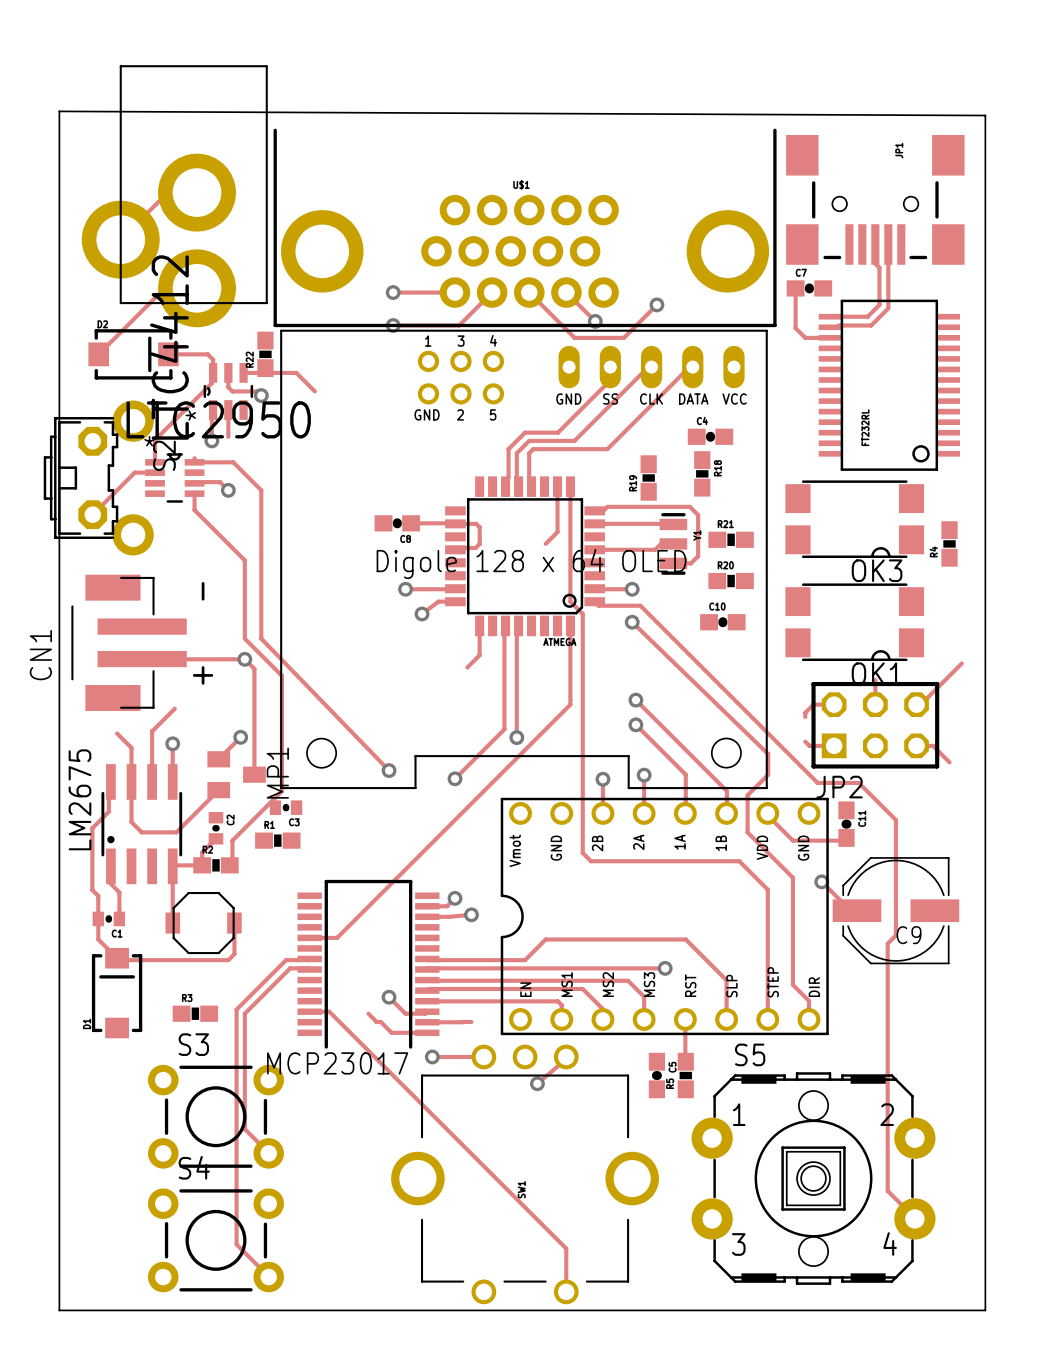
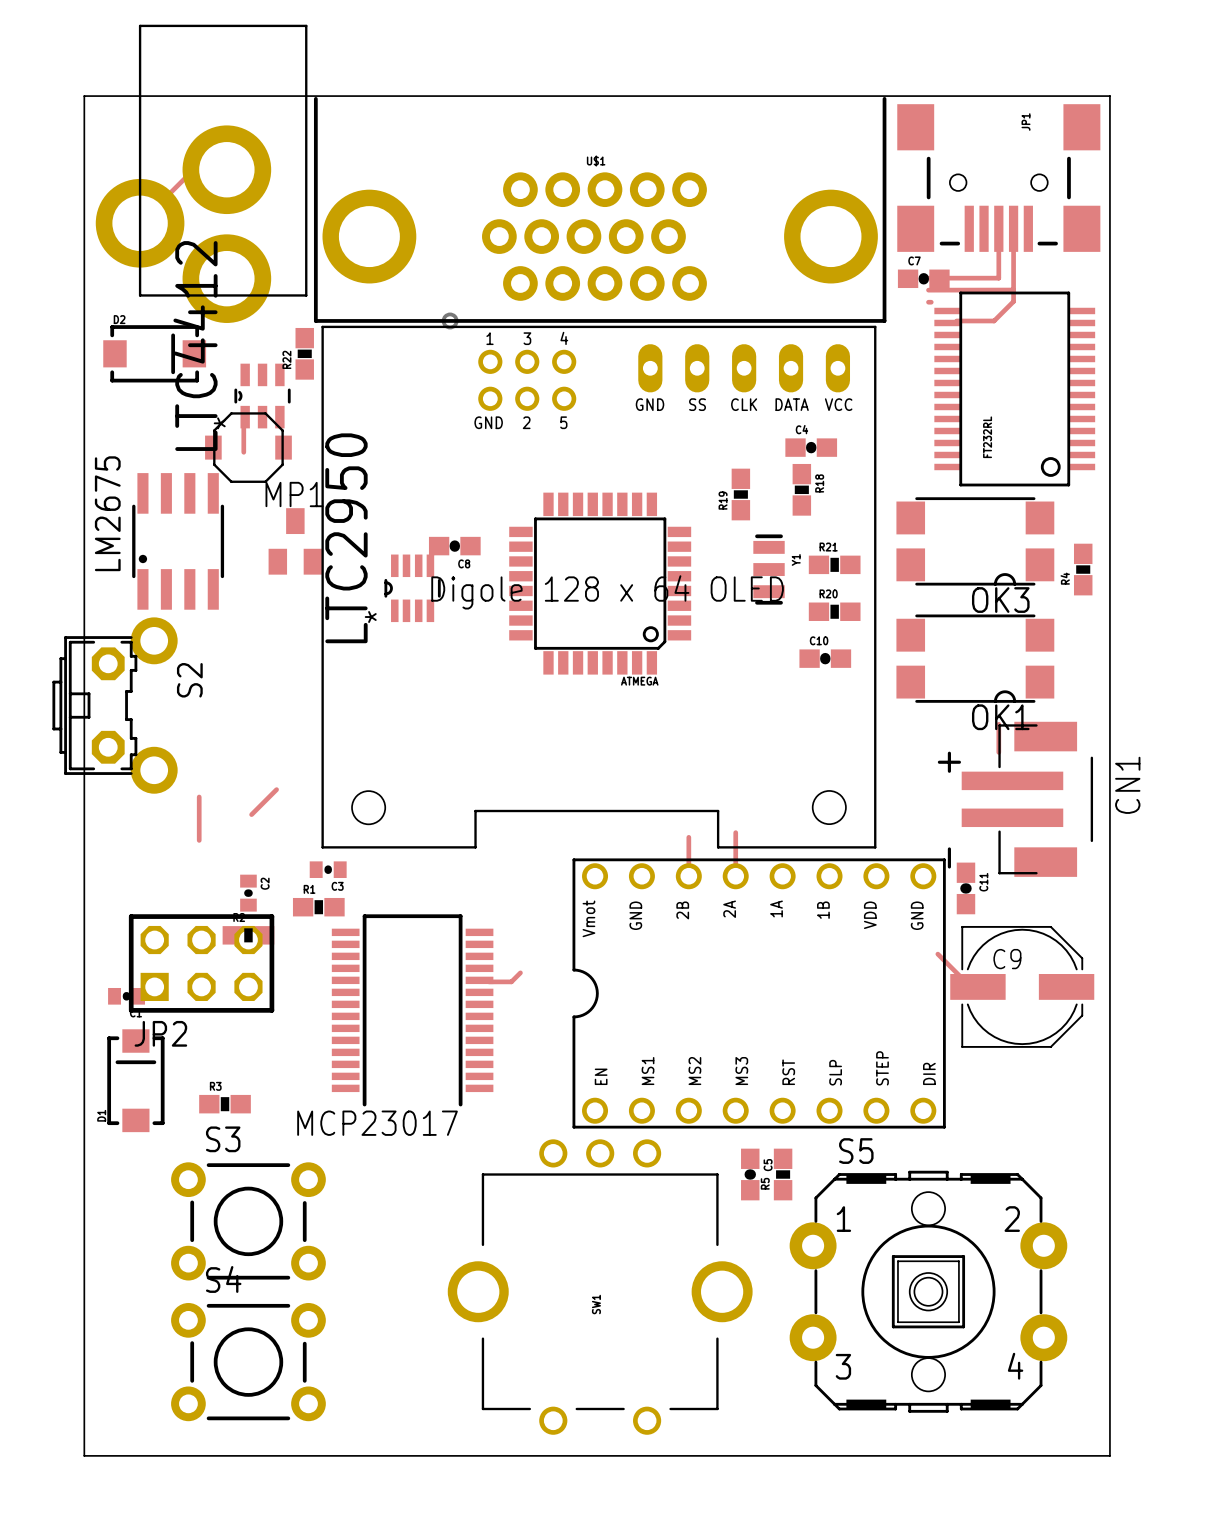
board edge: (59, 111) (985, 115) (985, 1310) (59, 1310) (59, 111) -> (84, 96) (84, 1455) (1109, 1455) (1109, 96) (84, 96)
track: none -> (998, 228) (998, 278) (928, 278)
track: (875, 263) (879, 267) (879, 304) (867, 316) (830, 316) -> none
track: (197, 288) (164, 288) (98, 354) -> none
track: (795, 288) (795, 328) (805, 337) (821, 337) -> none
track: (393, 292) (454, 292) -> none
via: (393, 292) -> none
track: (492, 292) (459, 325) (393, 325) -> none
track: (529, 292) (574, 337) (623, 337) (656, 304) -> none
track: (566, 292) (595, 321) -> none
track: none -> (928, 290) (1013, 290)
via: (656, 304) -> none
track: none -> (928, 302) (931, 302)
via: (595, 321) -> none
track: (168, 354) (207, 354) (213, 359) (211, 383) (155, 440) (155, 462) -> none
track: (610, 367) (610, 380) (558, 432) (525, 432) (508, 449) (508, 477) -> none
track: (651, 367) (648, 367) (574, 440) (529, 440) (516, 453) (516, 484) (518, 486) -> none
track: (692, 367) (689, 367) (607, 449) (533, 449) (529, 453) (529, 477) -> none
track: (228, 372) (228, 387) (232, 391) (257, 391) (261, 395) -> none
track: (243, 372) (296, 372) (314, 391) -> none
via: (261, 395) -> none
track: (228, 409) (228, 436) -> none
part: none -> (248, 447)
via: (211, 440) -> none
track: (194, 458) (194, 462) (233, 462) (261, 490) (261, 638) (389, 770) -> none
track: (155, 472) (134, 472) (92, 514) -> none
S2 position: (98, 477) -> (115, 705)
LTC2950 rotation: 0° (174, 477) -> 90° counterclockwise (412, 588)
LTC2950 position: (174, 477) -> (412, 588)
track: (203, 482) (220, 482) (228, 490) -> none
track: (557, 486) (557, 532) (545, 543) -> none
track: (570, 486) (570, 601) (582, 613) (582, 853) (590, 861) (739, 861) (767, 889) (767, 1019) -> none
via: (228, 490) -> none
track: (194, 493) (194, 510) (244, 560) (244, 638) (281, 675) (281, 791) (232, 840) (232, 862) (229, 865) -> none
track: (603, 510) (607, 506) (689, 506) (698, 515) (698, 556) (691, 563) (673, 563) -> none
track: (411, 523) (476, 523) (479, 527) (479, 543) (475, 548) (463, 548) -> none
track: (665, 523) (594, 523) -> none
track: (661, 543) (655, 549) (594, 549) -> none
CN1 footprint: [71, 574, 187, 711] -> [961, 721, 1094, 877]
track: (455, 588) (405, 589) -> none
track: (594, 588) (632, 589) -> none
via: (405, 589) -> none
via: (632, 589) -> none
track: (455, 601) (438, 601) (422, 613) -> none
track: (594, 601) (598, 605) (640, 605) (817, 782) (858, 782) (895, 820) (895, 935) (887, 943) (887, 1190) (914, 1218) -> none
via: (422, 613) -> none
track: (632, 622) (768, 754) (768, 774) (747, 795) (747, 832) (792, 877) (792, 984) (808, 1000) (808, 1019) -> none
via: (632, 622) -> none
track: (479, 625) (479, 655) (467, 667) -> none
track: (505, 625) (504, 729) (455, 778) -> none
track: (518, 625) (516, 627) (516, 737) -> none
track: (570, 626) (570, 704) (337, 937) (309, 937) -> none
CN1 name position: CN1 (40, 655) -> CN1 (1127, 785)
track: (178, 659) (244, 659) (254, 668) (254, 774) -> none
via: (244, 659) -> none
track: (961, 663) (920, 704) (916, 704) -> none
track: (635, 700) (726, 791) (726, 813) -> none
via: (635, 700) -> none
track: (834, 704) (813, 704) (805, 712) (805, 717) -> none
track: (174, 708) (152, 731) (152, 781) -> none
track: (635, 724) (685, 774) (685, 813) -> none
via: (635, 724) -> none
JP2 position: (875, 725) -> (201, 963)
track: (117, 733) (131, 747) (131, 822) (141, 832) (176, 832) (218, 790) -> none
via: (240, 737) -> none
via: (516, 737) -> none
track: (805, 741) (809, 745) (834, 745) -> none
via: (172, 743) -> none
track: (916, 745) (933, 745) (949, 762) -> none
via: (389, 770) -> none
MP1 rotation: 0° (236, 774) -> 90° counterclockwise (295, 541)
MP1 position: (236, 774) -> (295, 541)
via: (644, 775) -> none
via: (455, 778) -> none
via: (602, 779) -> none
track: (112, 795) (108, 799) (108, 811) (92, 828) (92, 890) (98, 896) (98, 939) (119, 960) (228, 960) (234, 954) (234, 923) -> none
track: (767, 813) (792, 840) (843, 840) (846, 837) -> none
LM2675 position: (141, 824) -> (178, 541)
track: (215, 838) (202, 852) (202, 865) (172, 866) (172, 922) -> none
track: (110, 866) (112, 868) (112, 881) (108, 881) (119, 892) (119, 918) -> none
via: (821, 881) -> none
via: (455, 898) -> none
C9 rotation: 0° (895, 910) -> 180° (1022, 986)
track: (471, 914) (427, 916) -> none
via: (471, 914) -> none
part: (203, 923) -> none
track: (427, 958) (525, 960) (545, 939) (685, 939) (726, 980) (726, 1019) -> none
track: (298, 960) (286, 960) (236, 1009) (236, 1244) (268, 1277) -> none
MCP23017 position: (368, 964) -> (412, 1010)
track: (665, 968) (427, 969) -> none
via: (665, 968) -> none
track: (309, 969) (290, 968) (244, 1013) (244, 1129) (268, 1153) -> none
track: (427, 980) (628, 980) (644, 996) (644, 1019) -> none
track: (427, 990) (428, 988) (582, 988) (602, 1009) (602, 1019) -> none
track: (389, 997) (405, 1013) (425, 1013) (427, 1011) -> none
via: (389, 997) -> none
track: (427, 1001) (558, 1001) (561, 1005) (561, 1019) -> none
track: (309, 1011) (329, 1011) (566, 1248) (566, 1291) -> none
track: (368, 1013) (391, 1032) (427, 1032) -> none
track: (685, 1019) (685, 1054) -> none
track: (471, 1021) (427, 1022) -> none
track: (432, 1056) (483, 1056) -> none
via: (432, 1056) -> none
track: (566, 1056) (566, 1059) (537, 1083) -> none
via: (537, 1083) -> none

